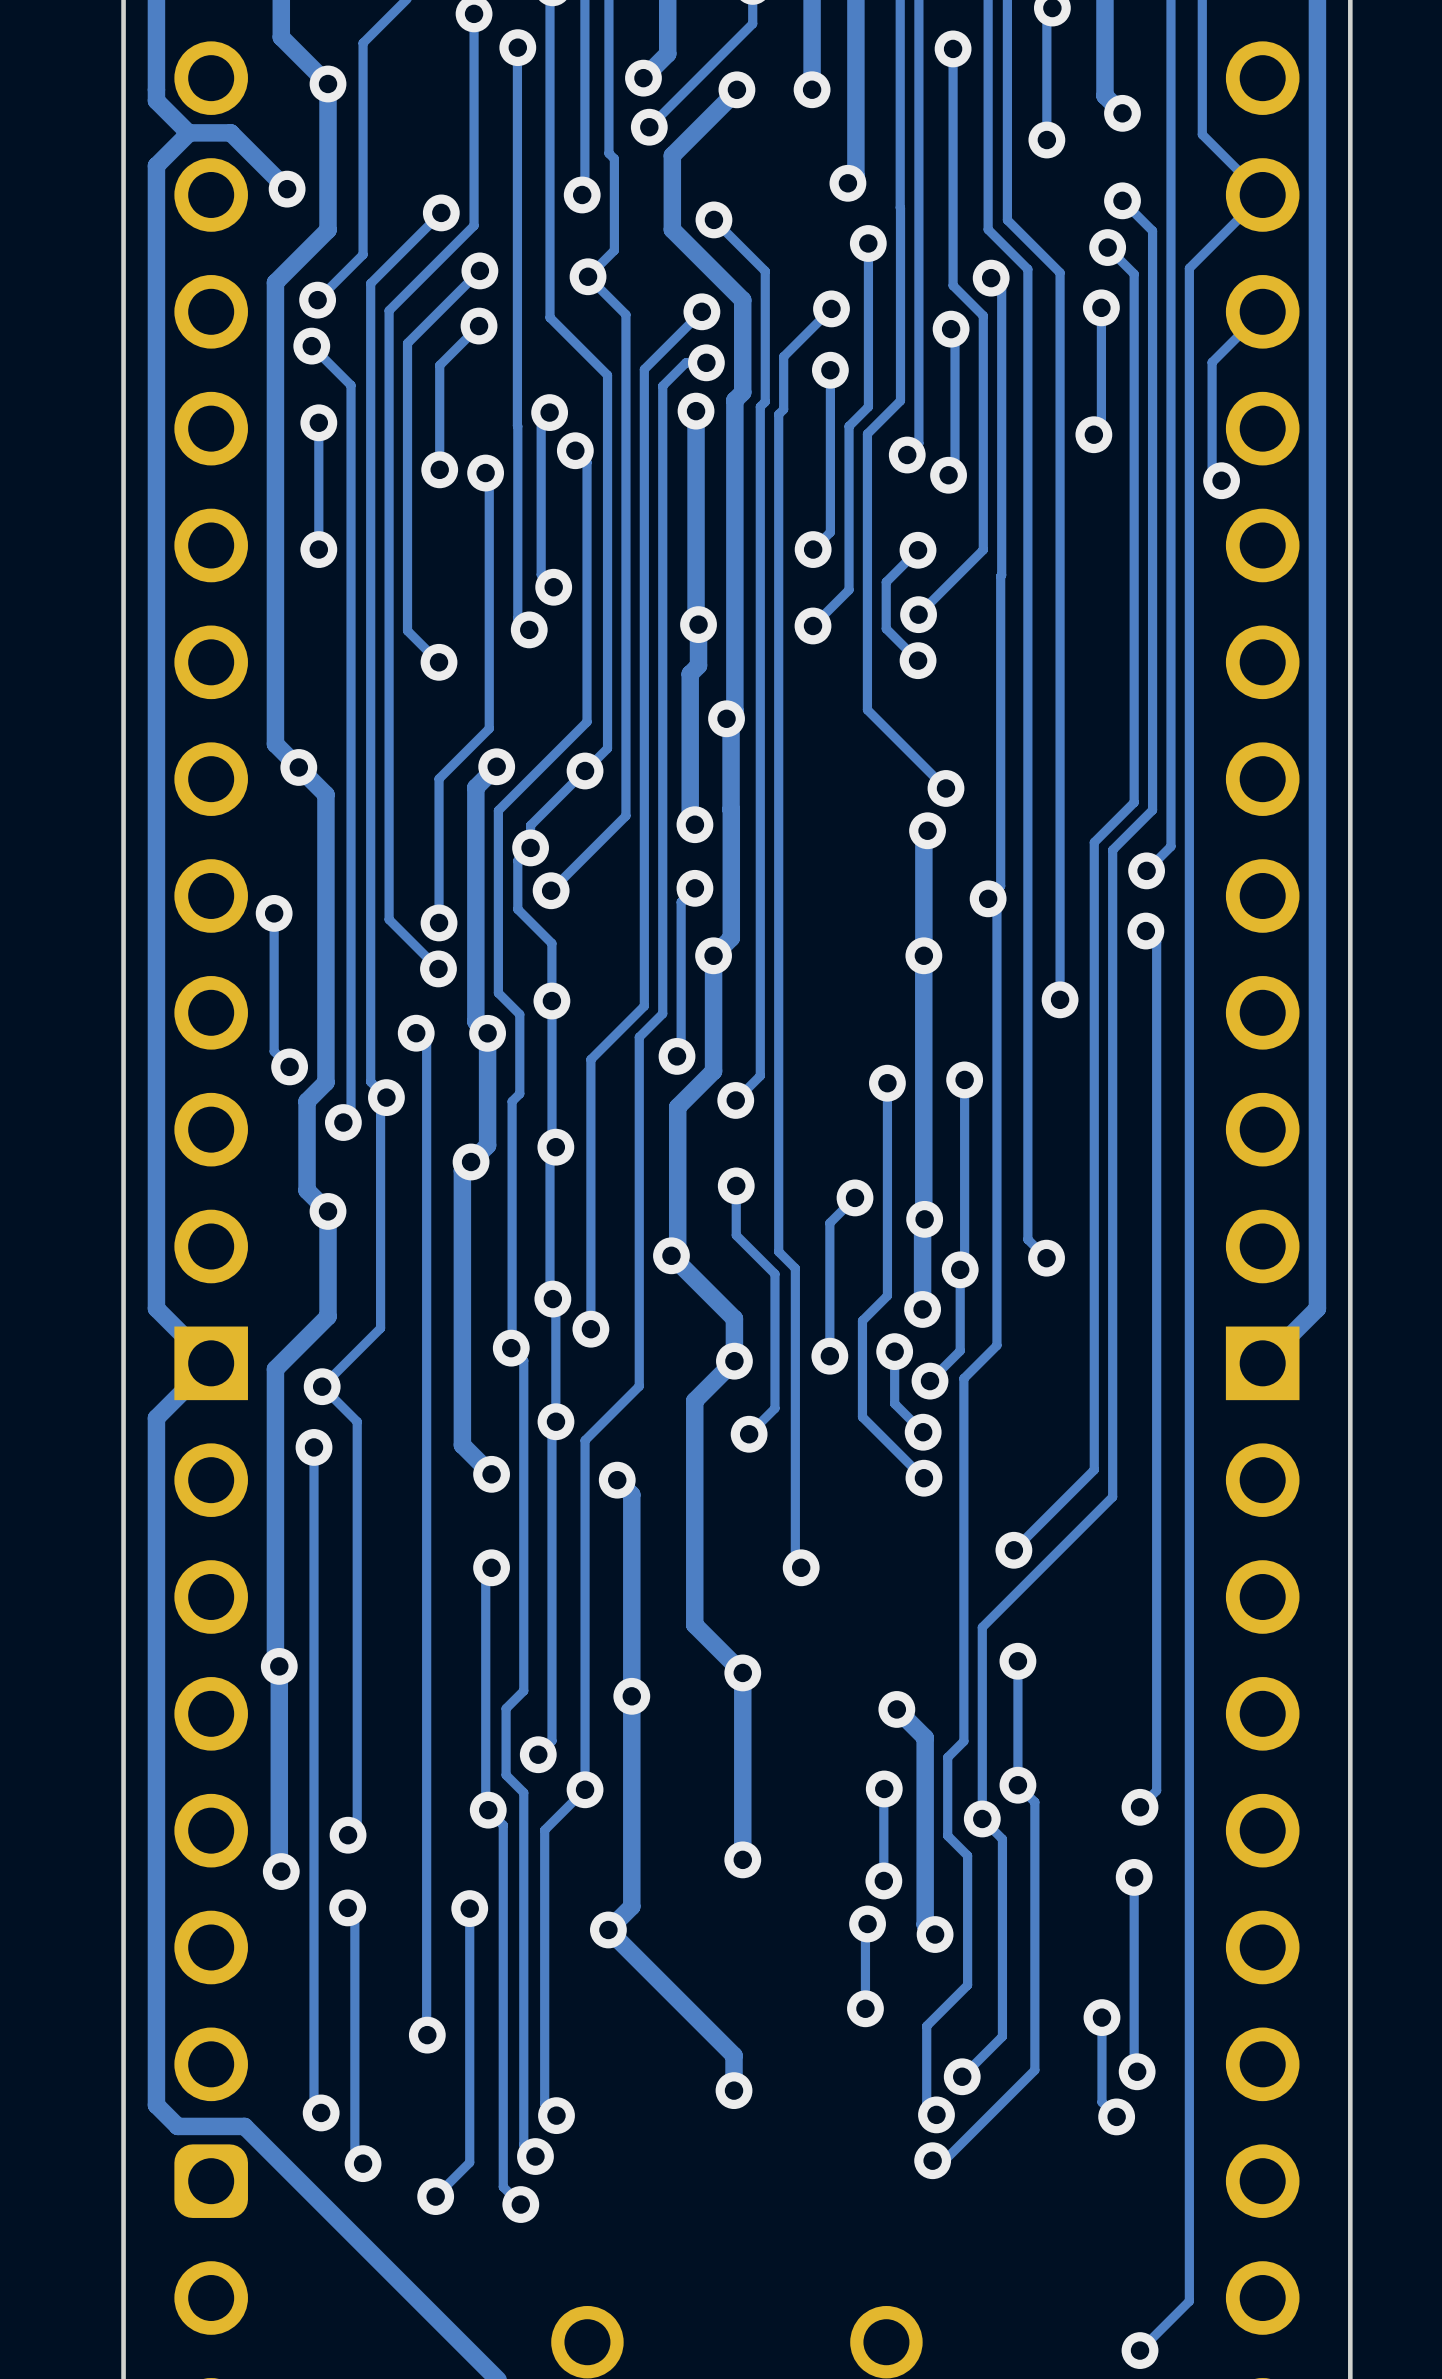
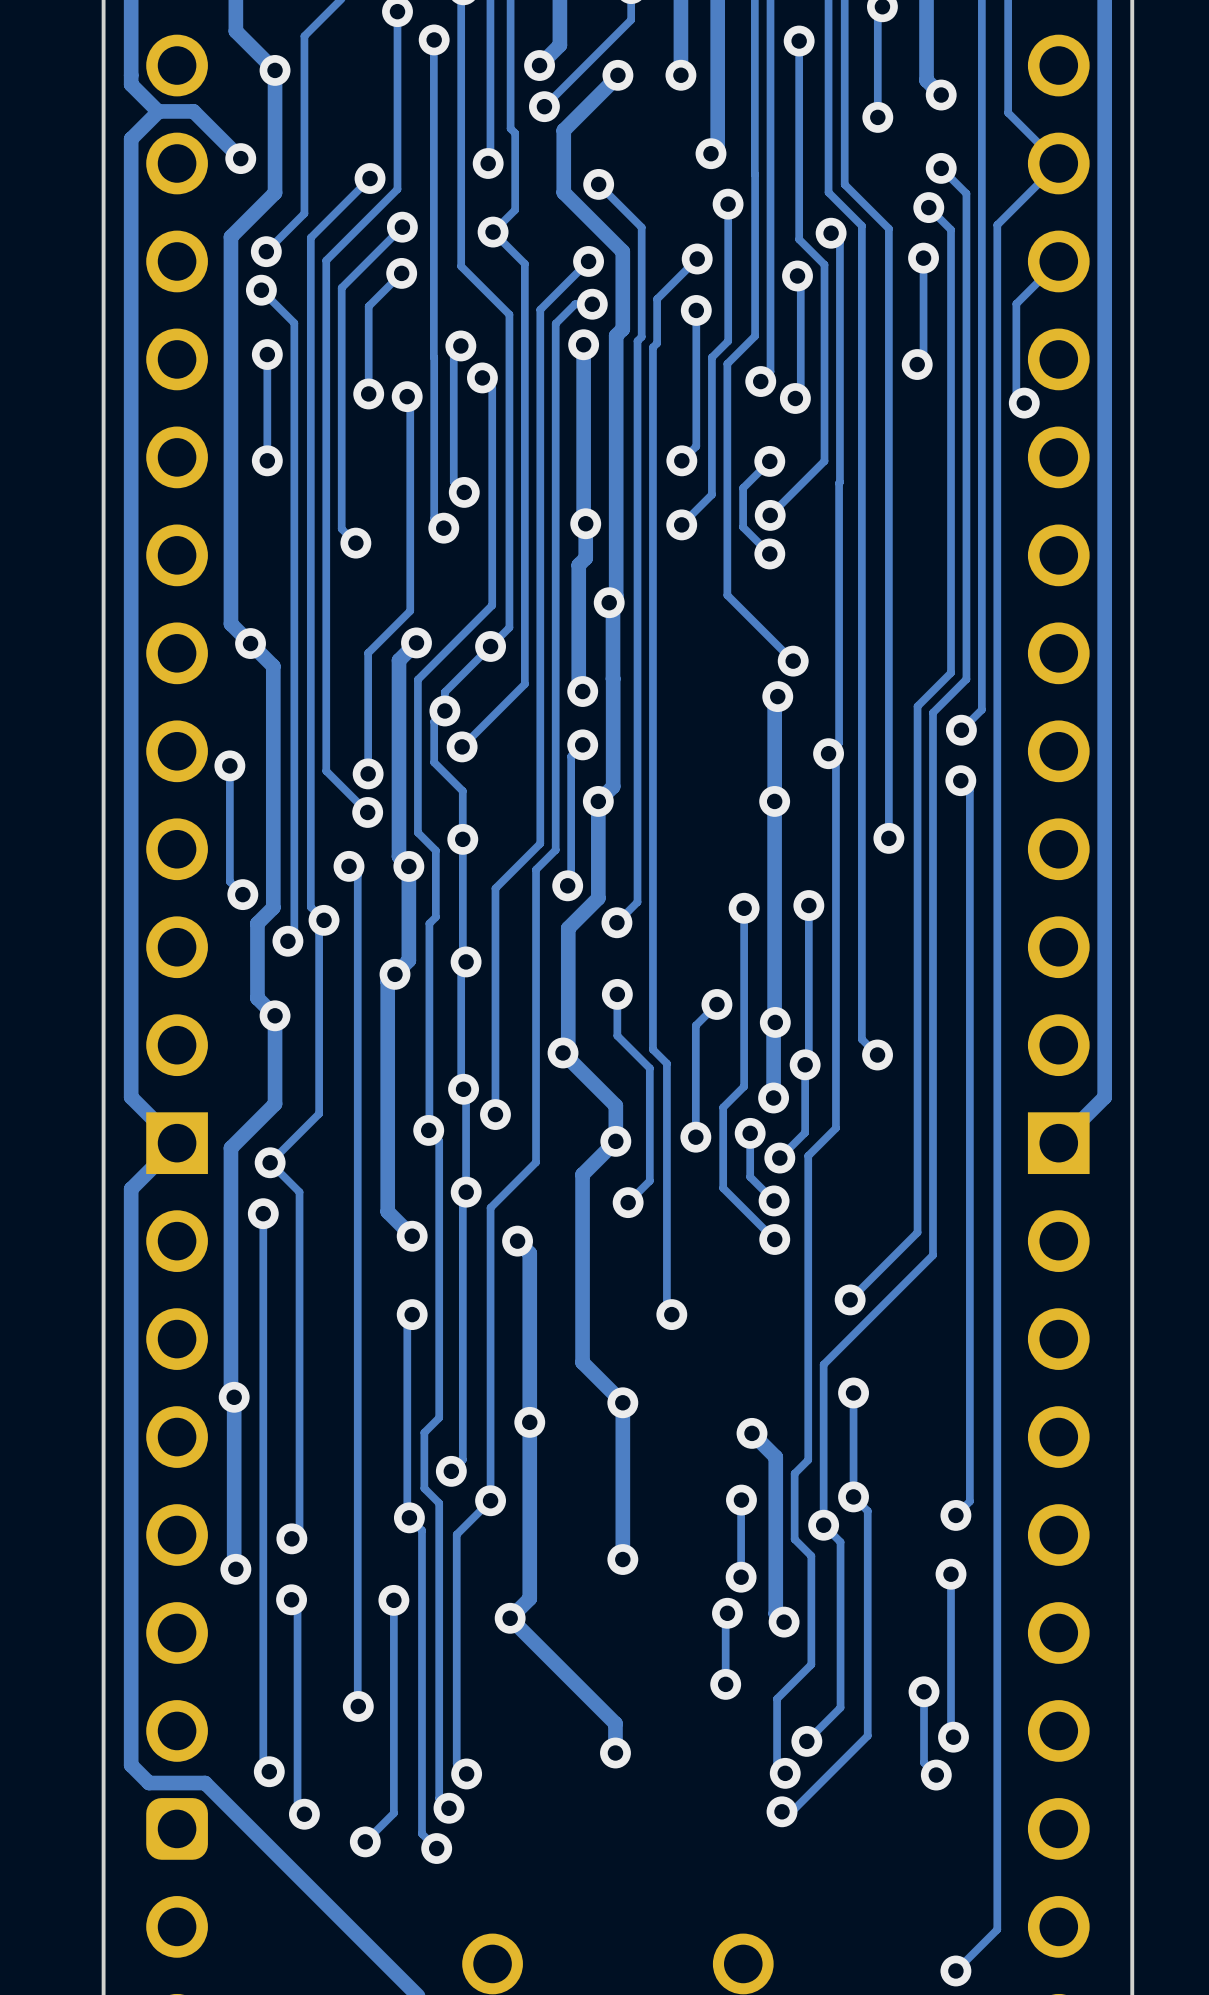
via position: (439, 662) -> (355, 543)

